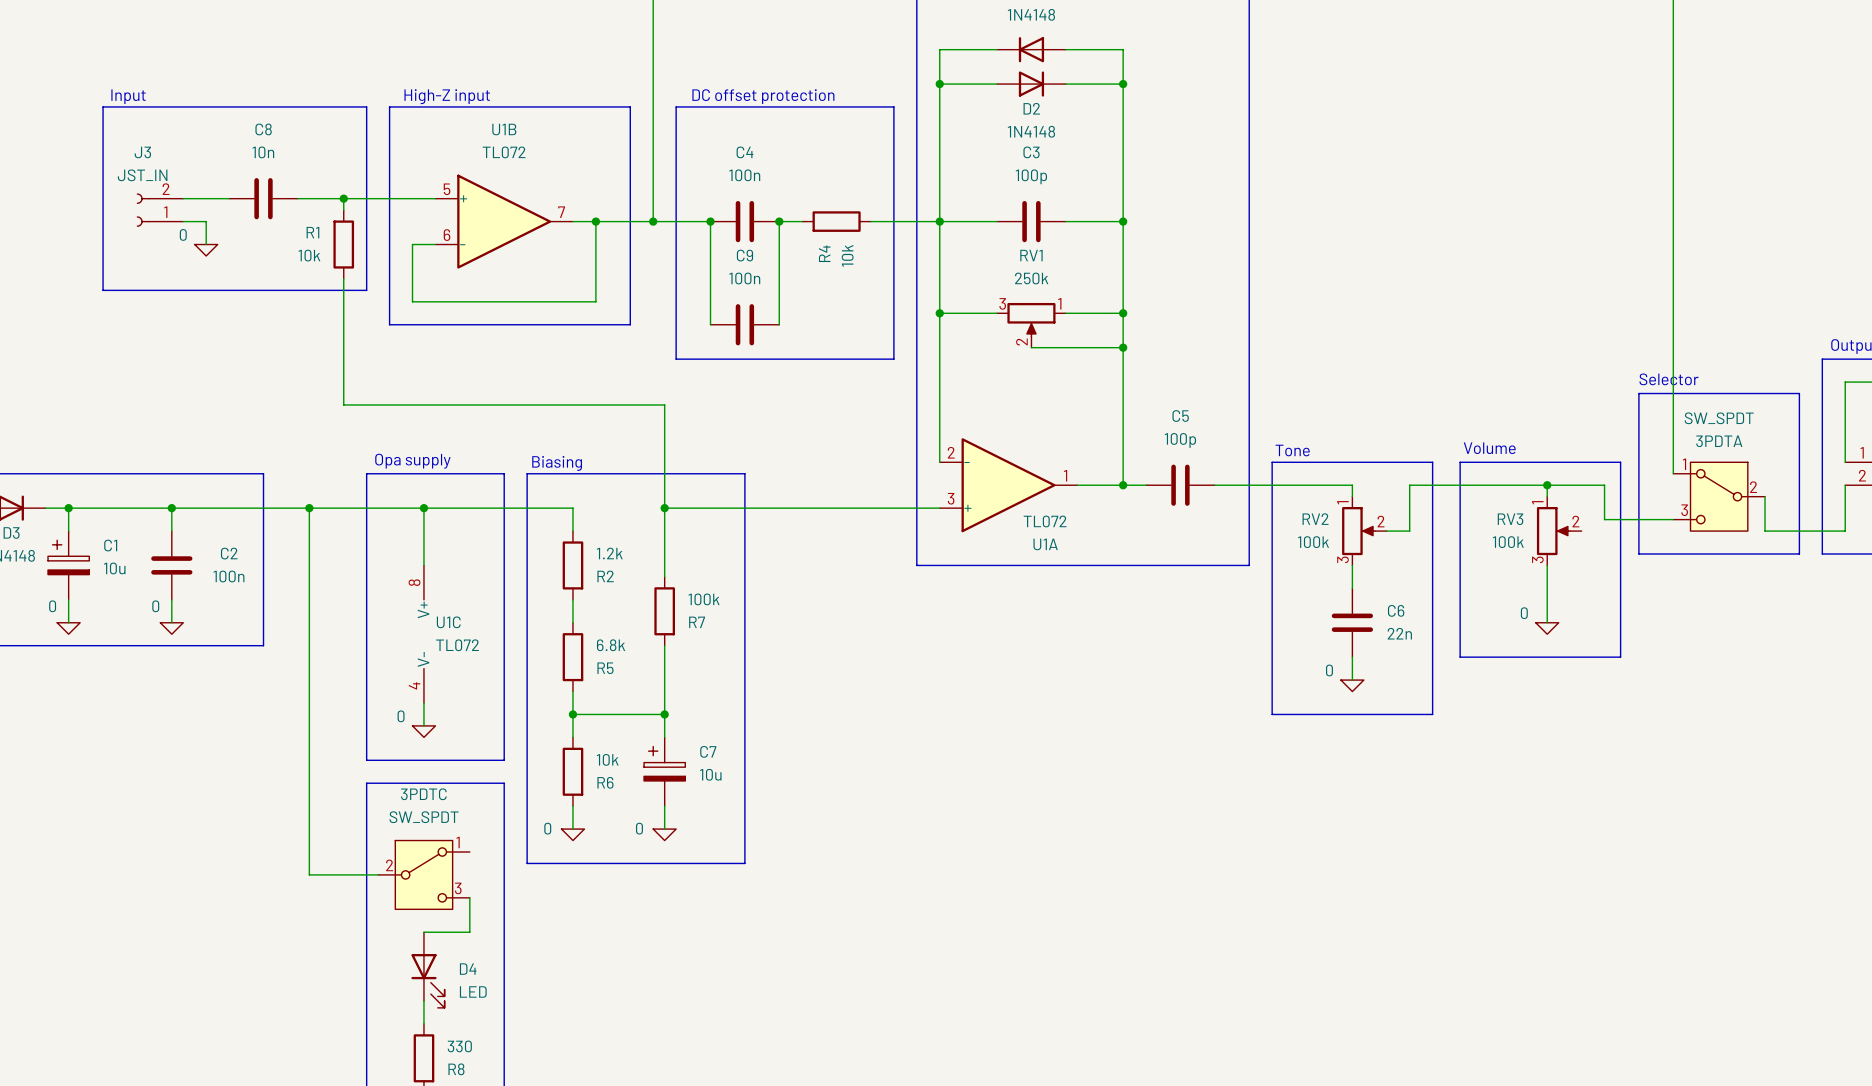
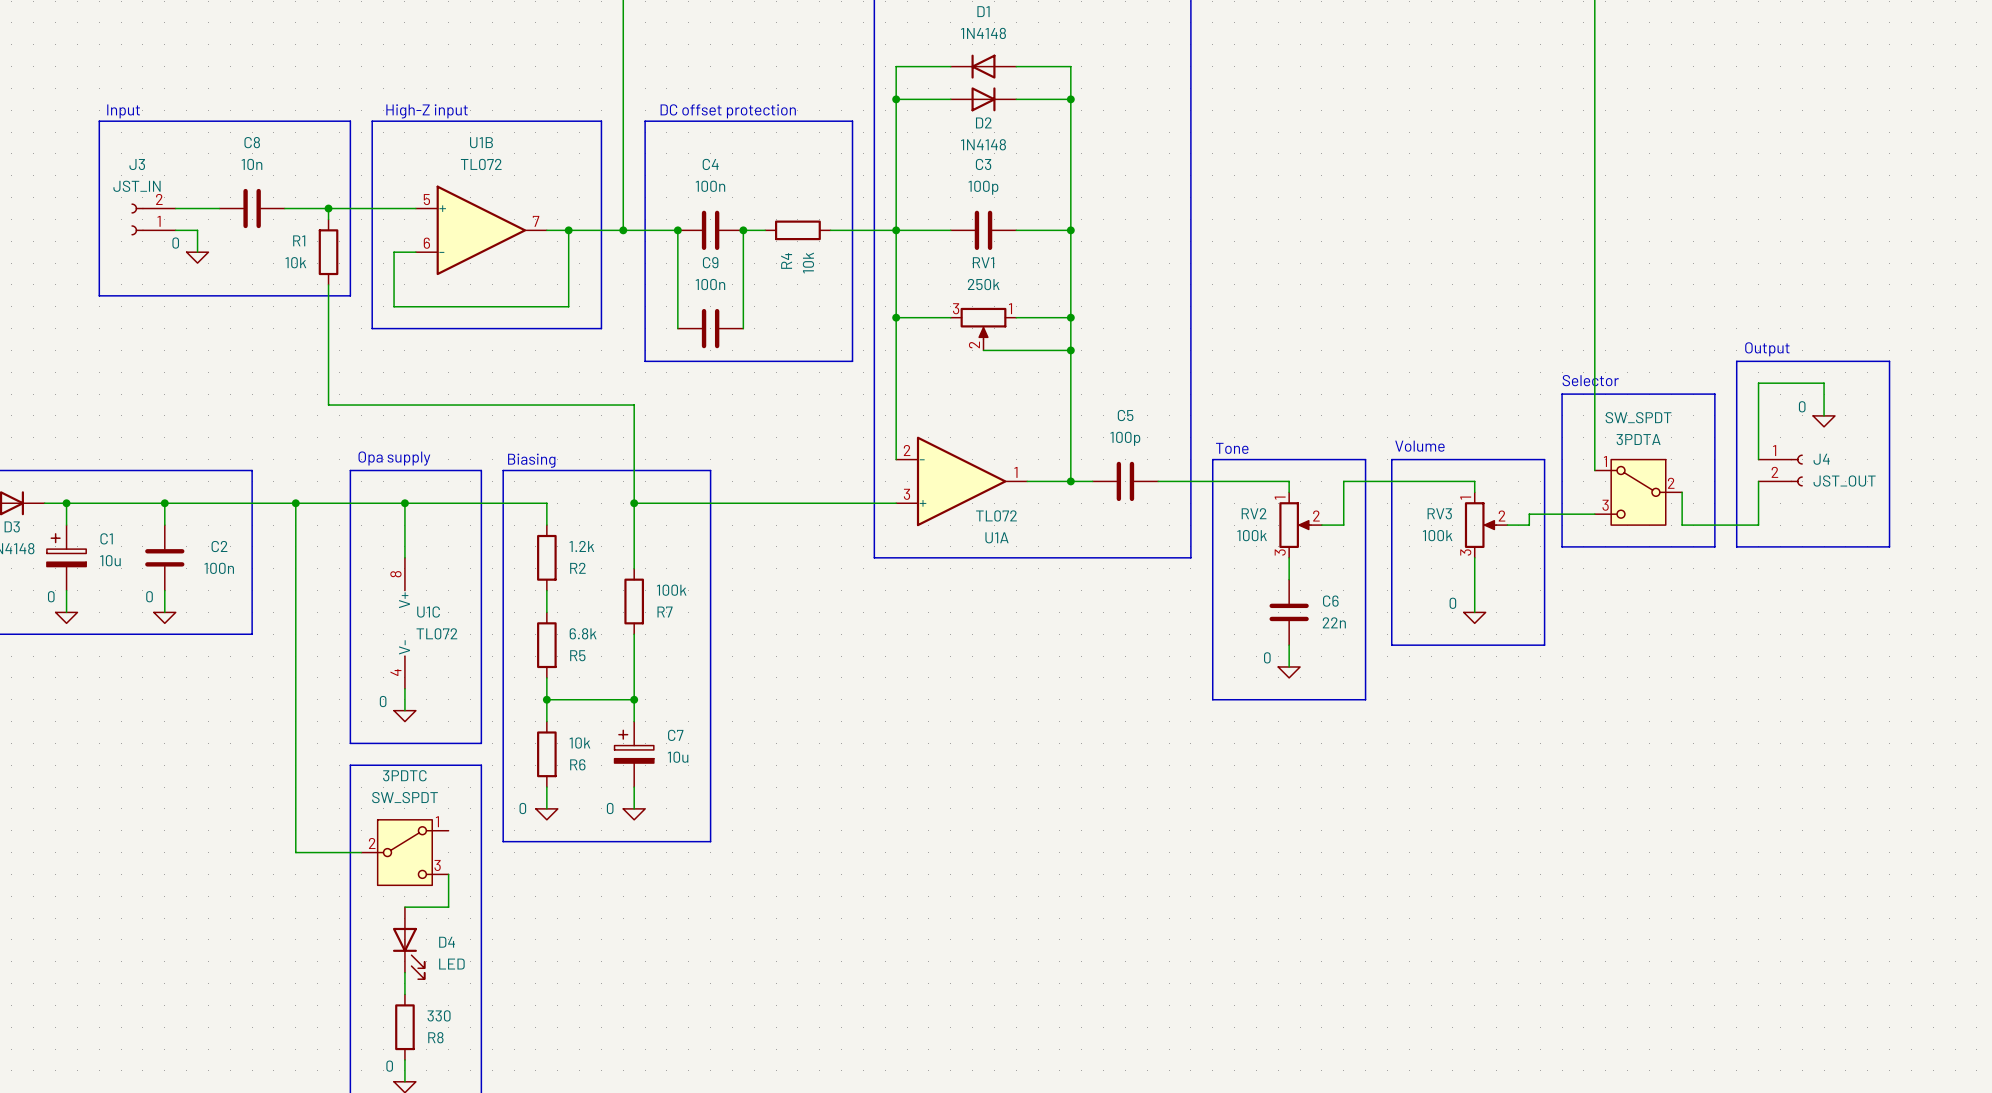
wire: (1547, 485) (1604, 485) (1604, 519) -> (1507, 525) (1529, 525) (1529, 514)
junction: (1547, 485) -> none

